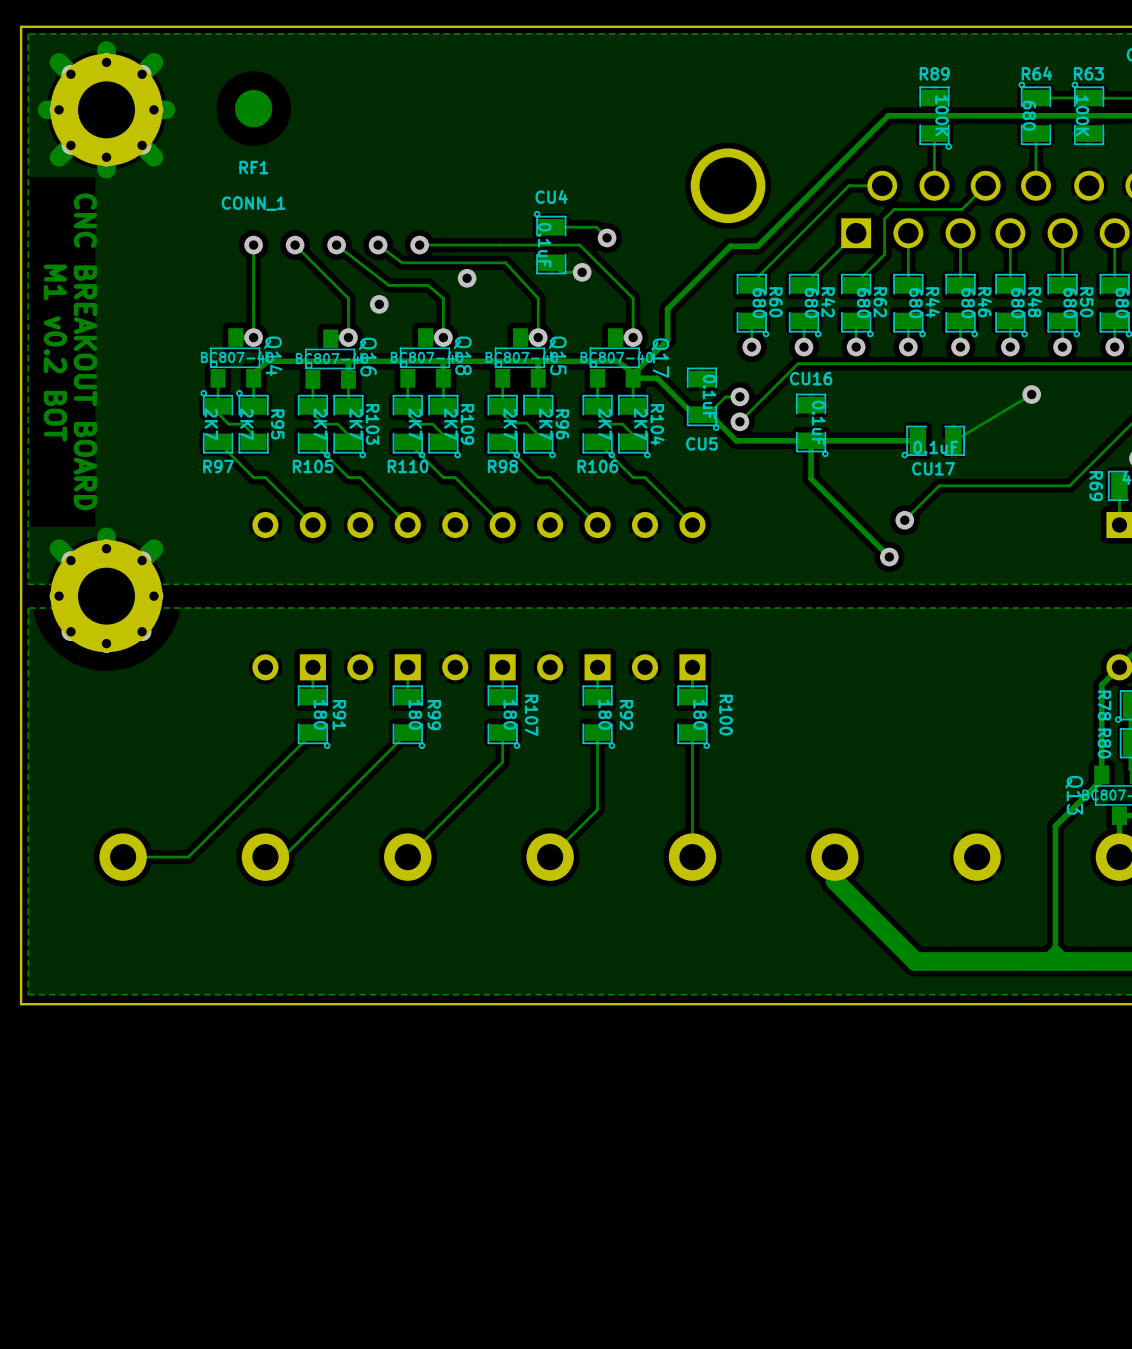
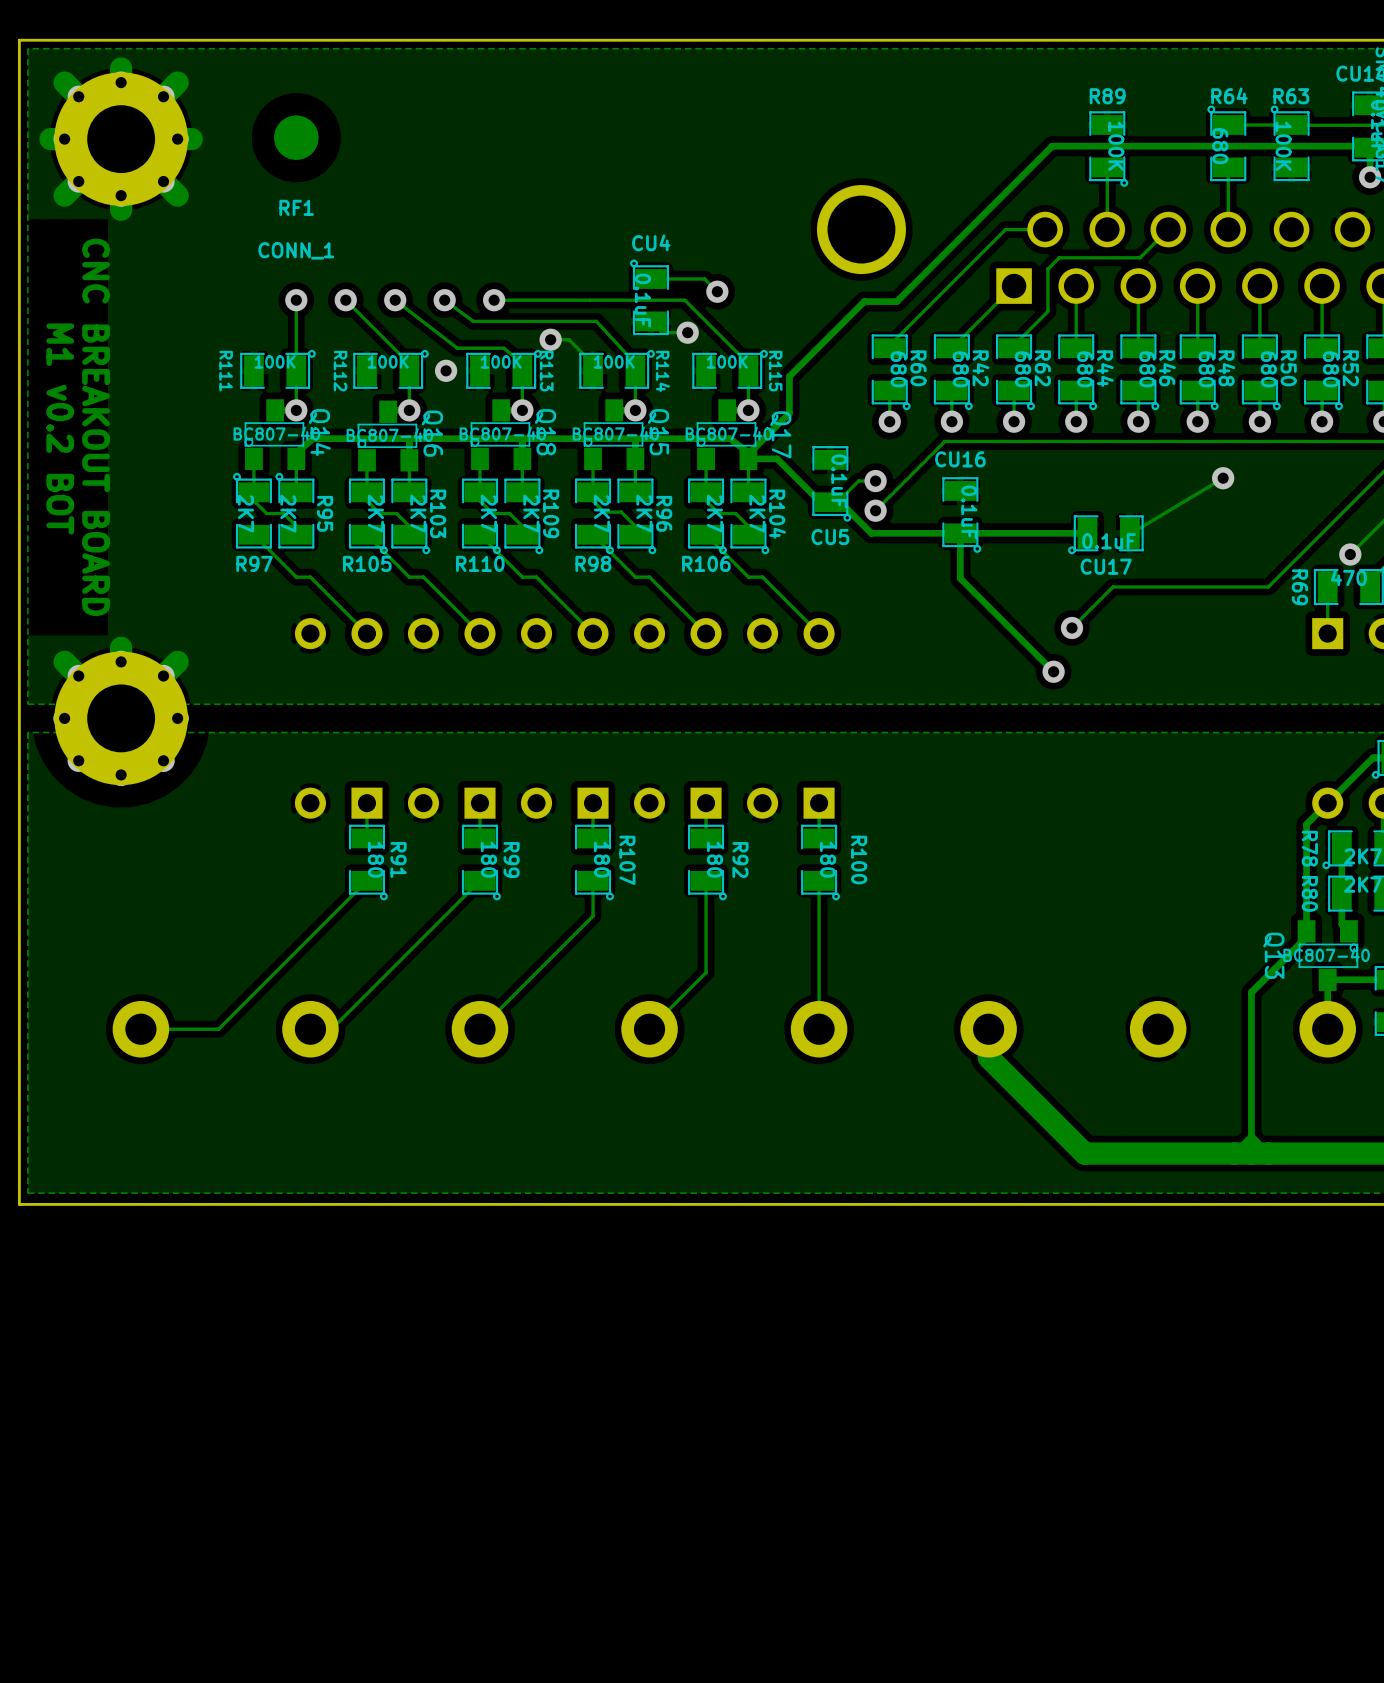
track: none -> (550, 339) (569, 339) (593, 363) (593, 370)
R111: none -> 100K (277, 369)
R112: none -> 100K (390, 369)
R113: none -> 100K (504, 369)
R114: none -> 100K (617, 369)
R115: none -> 100K (730, 369)

